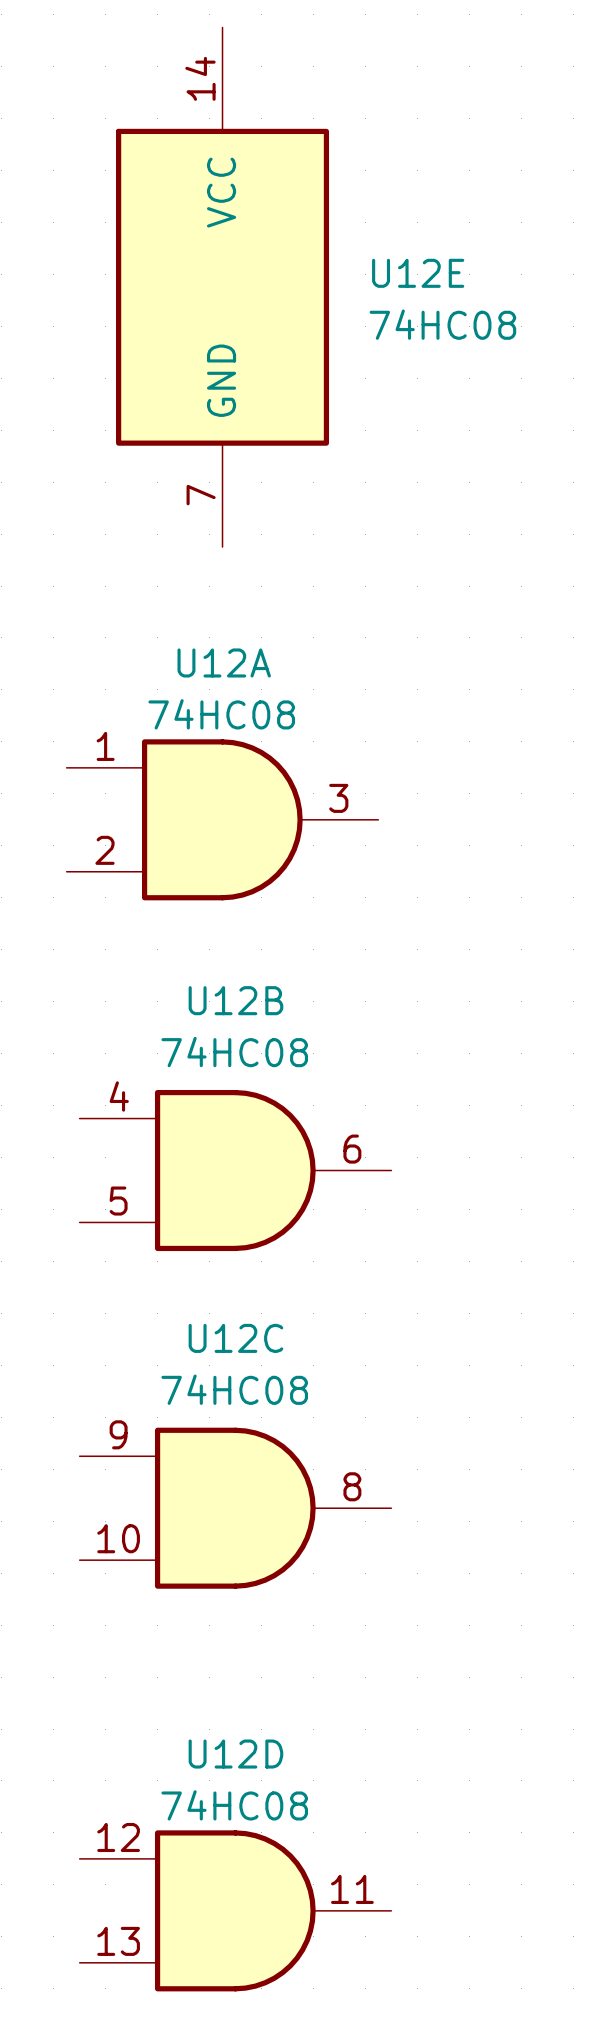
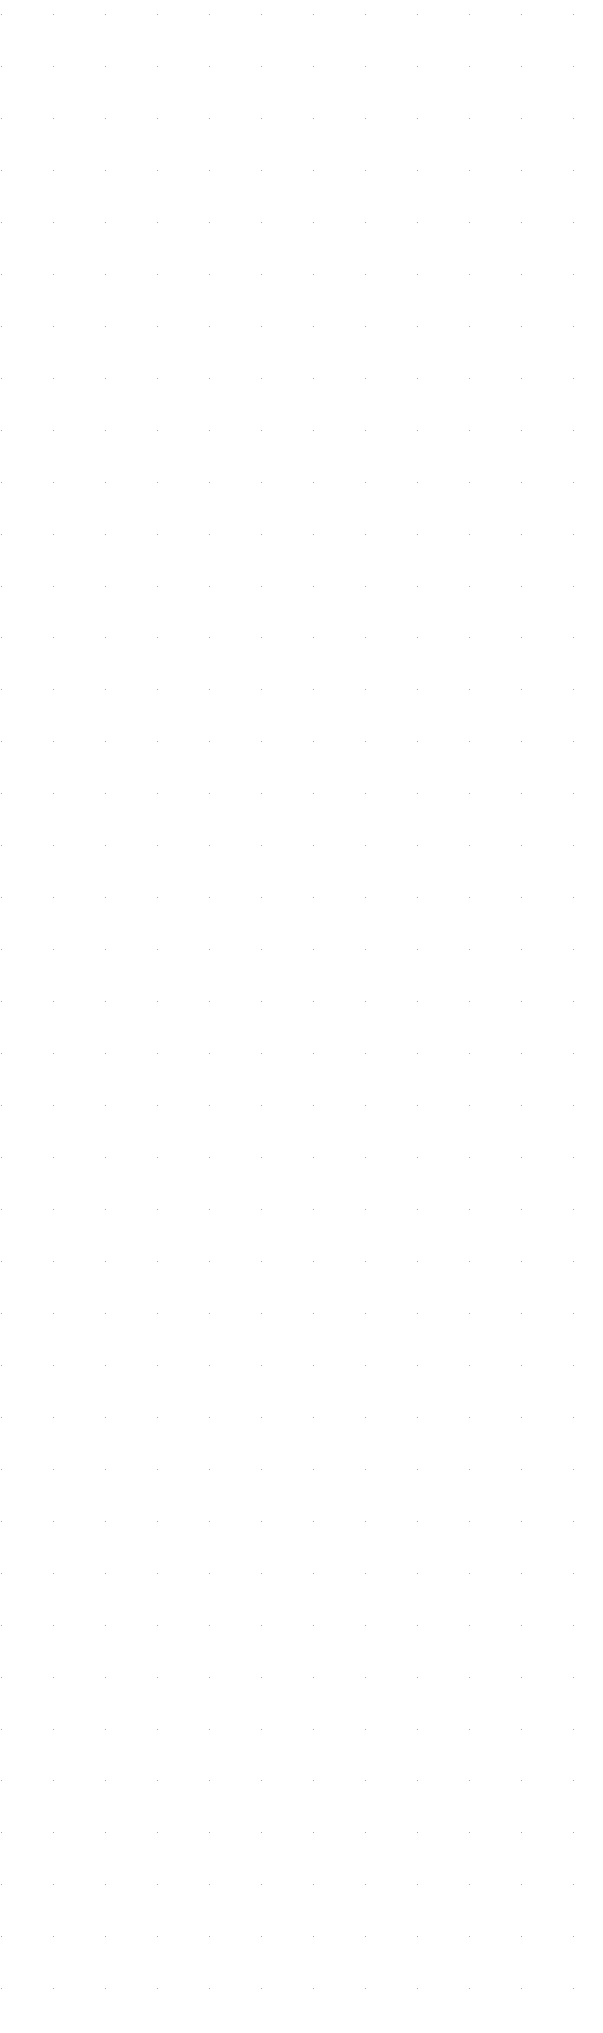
U12E: 74HC08 (222, 287) -> none
U12A: 74HC08 (222, 819) -> none
U12B: 74HC08 (235, 1170) -> none
U12C: 74HC08 (235, 1508) -> none
U12D: 74HC08 (235, 1910) -> none

